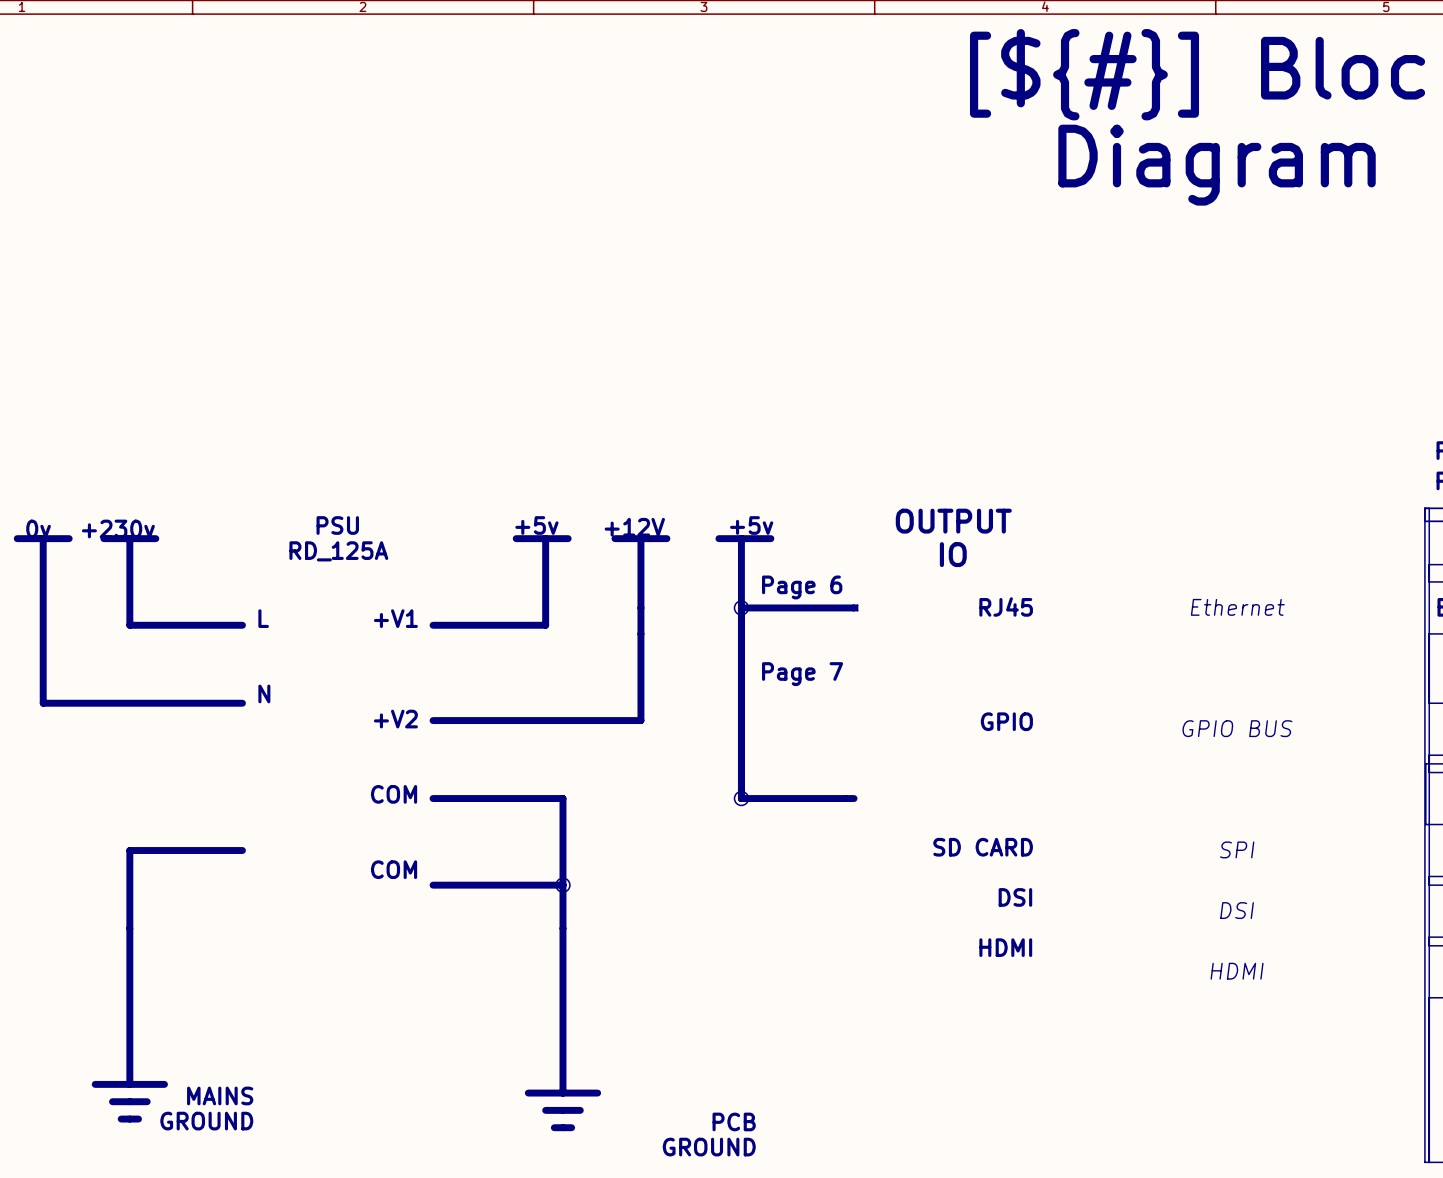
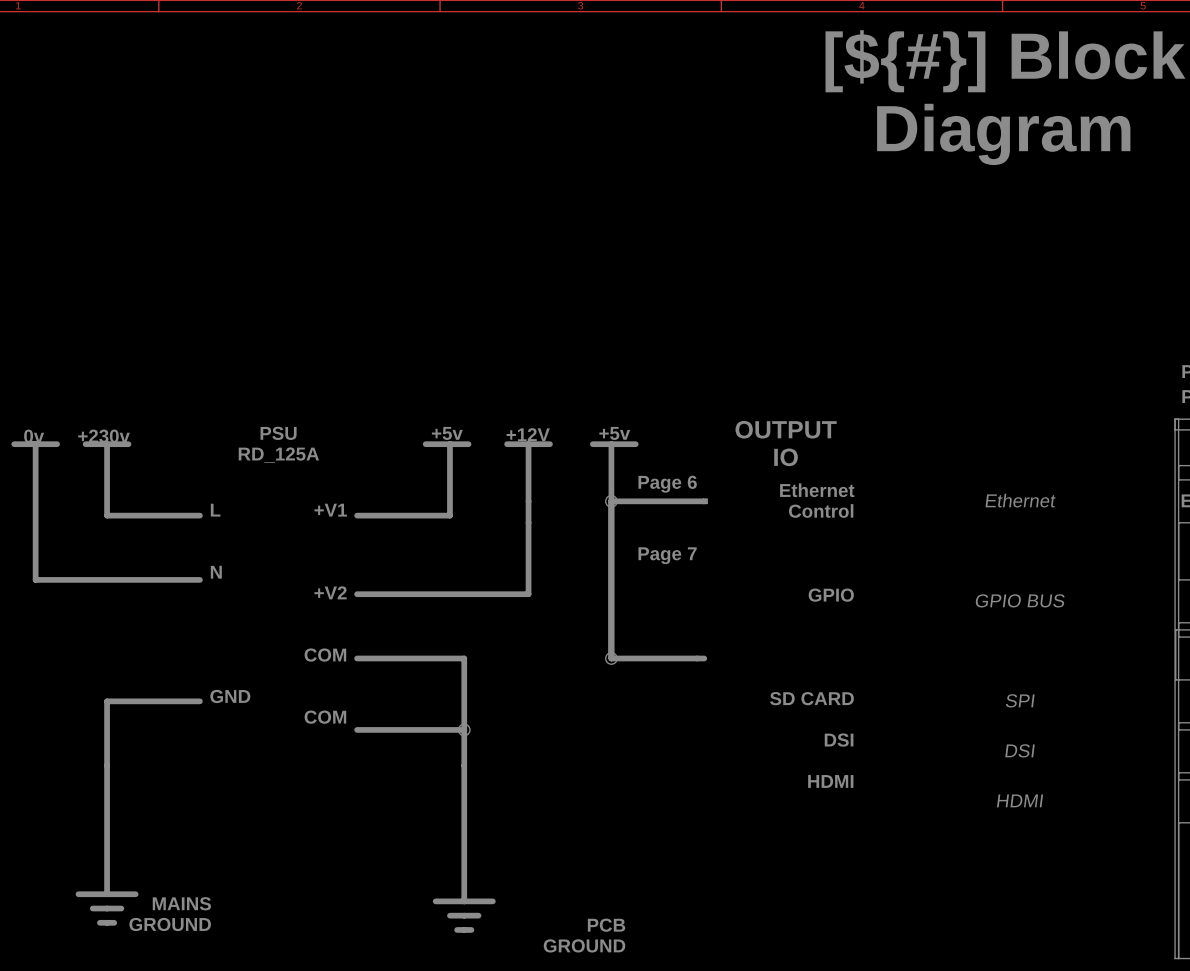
text: none -> Ethernet (817, 490)
text: RJ45 (1006, 606) -> none
text: none -> Control (821, 510)
text: none -> GND (230, 696)

